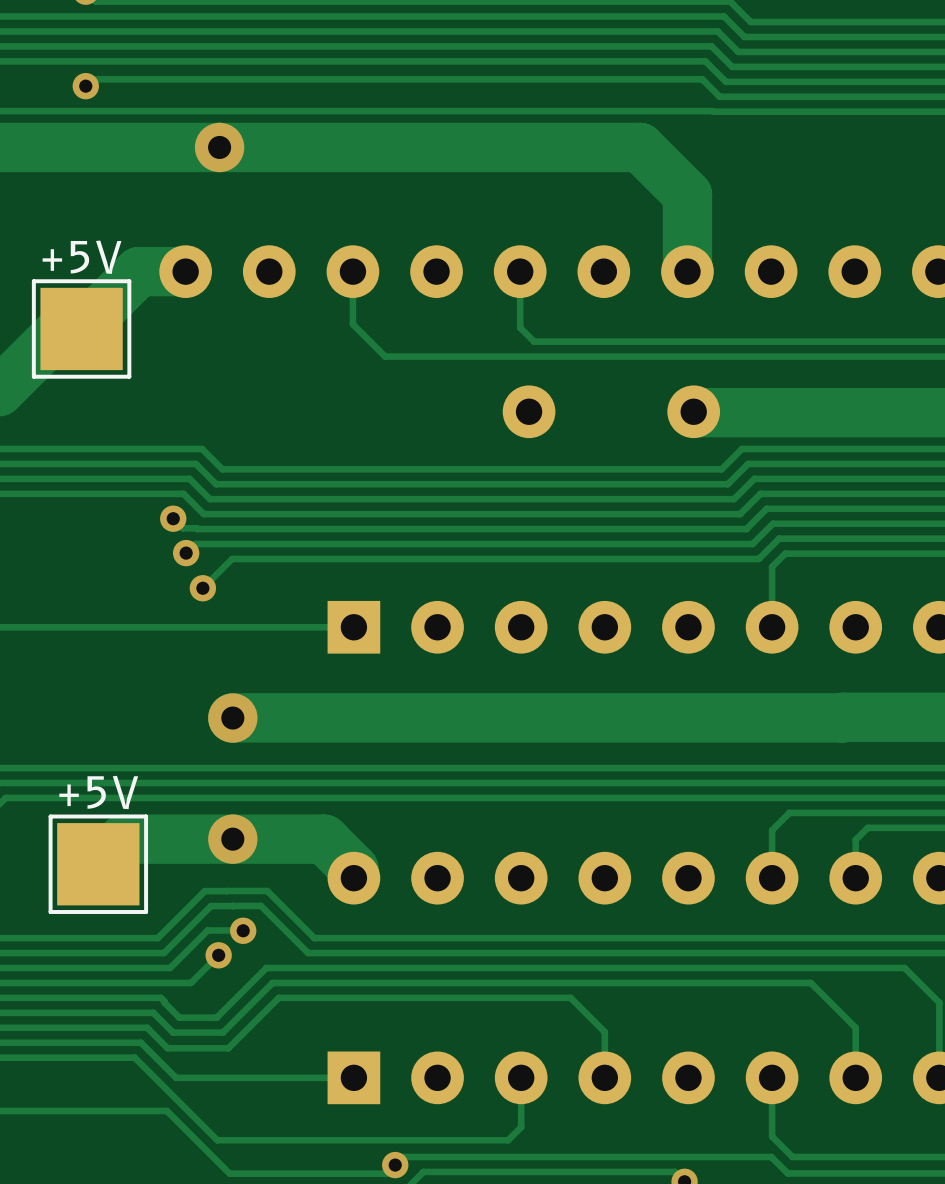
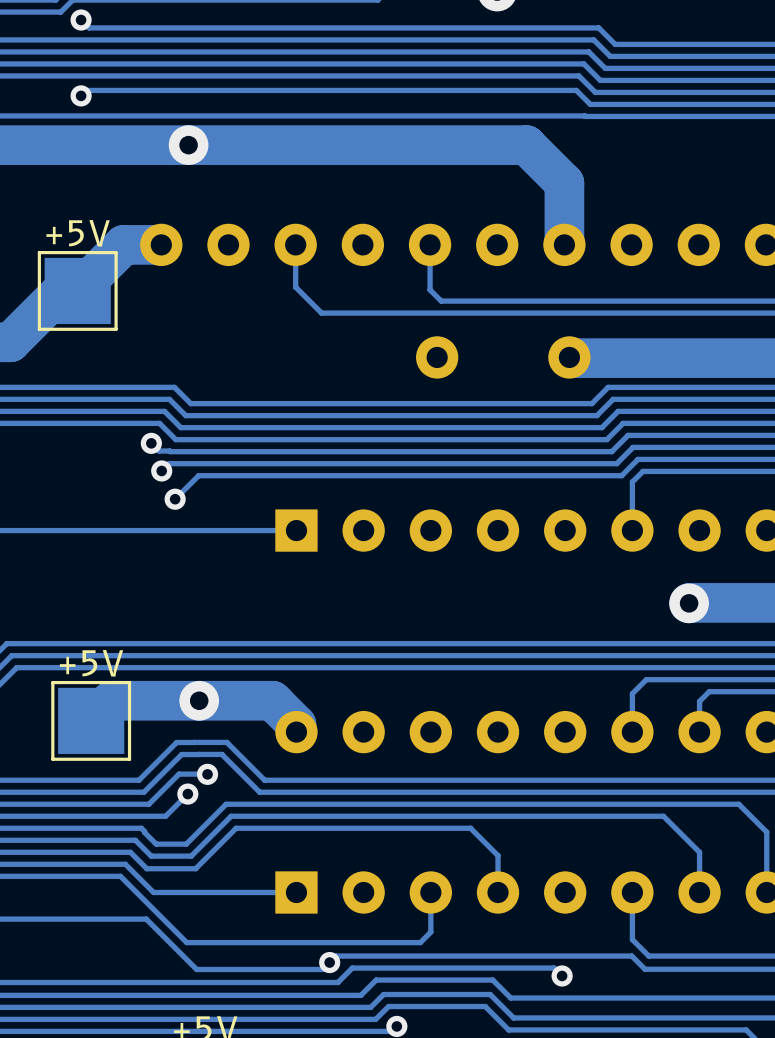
track: (842, 717) (232, 717) -> none
via: none -> (689, 603)
via: (232, 718) -> none

